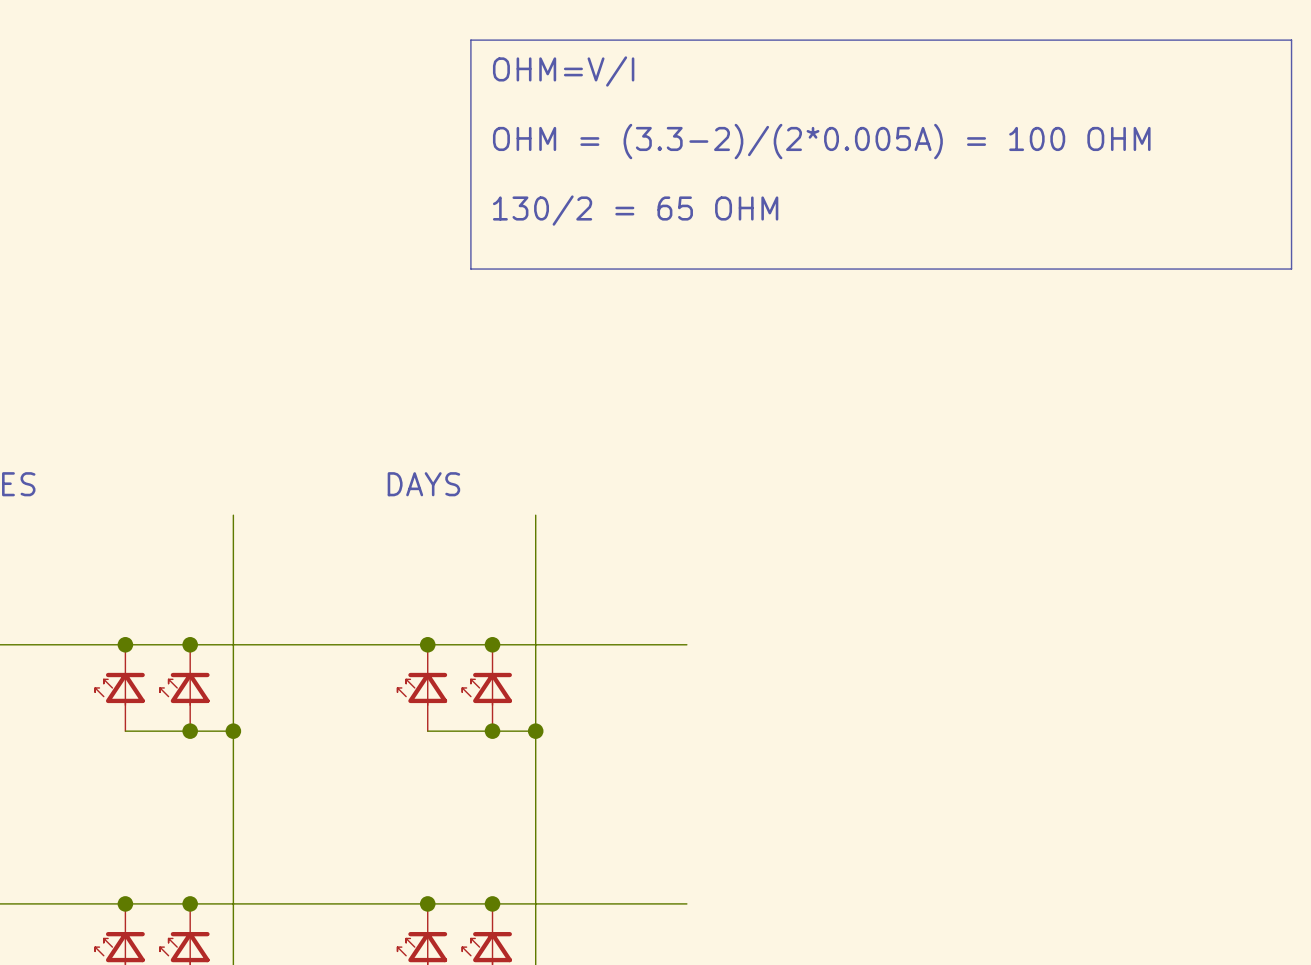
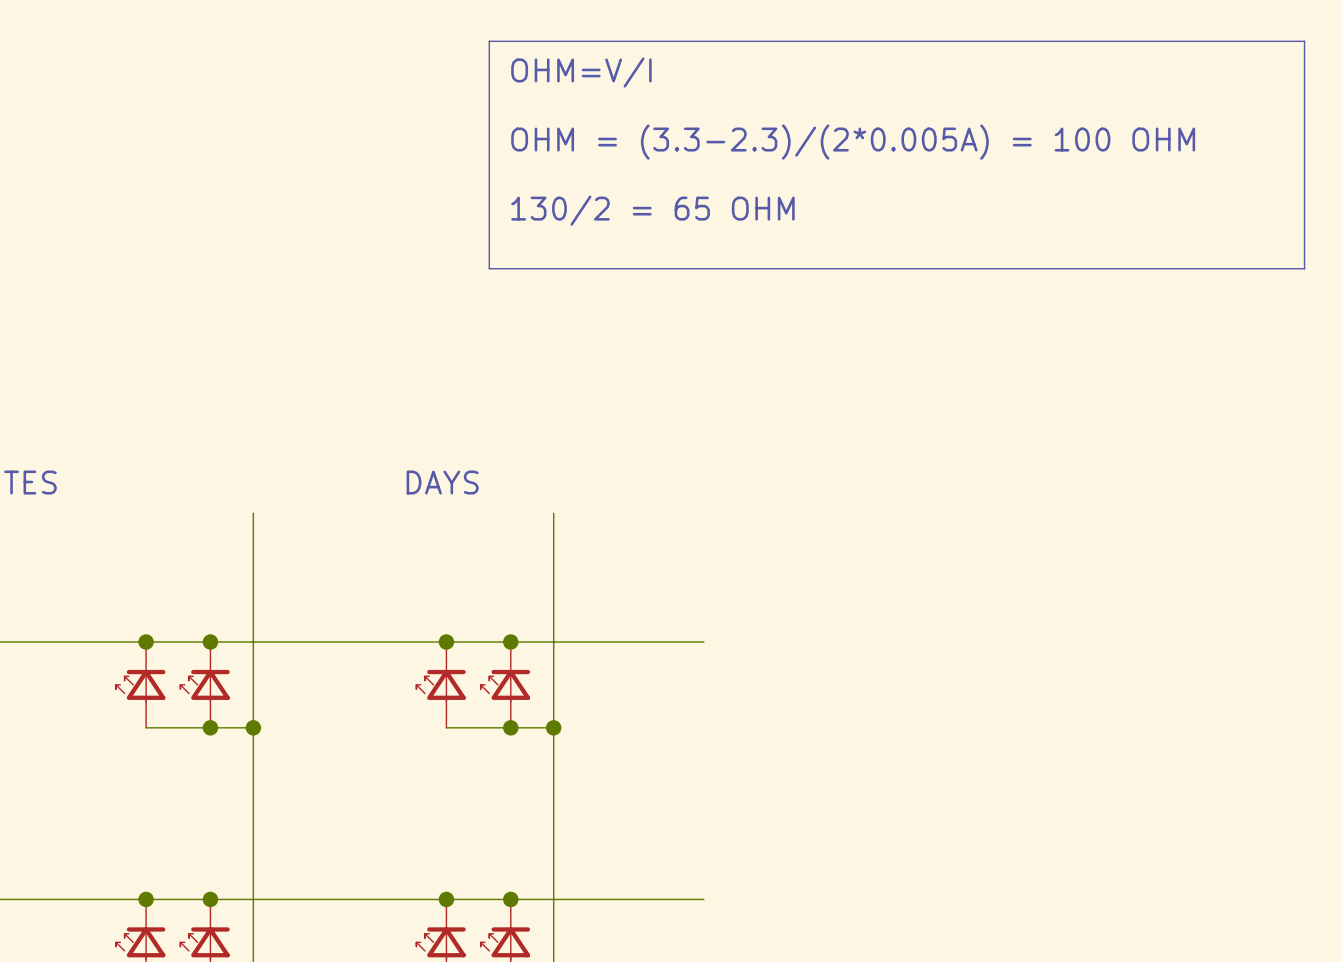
text: OHM = (3.3-2)/(2*0.005A) = 100 OHM (821, 141) -> OHM = (3.3-2.3)/(2*0.005A) = 100 OHM (853, 142)

